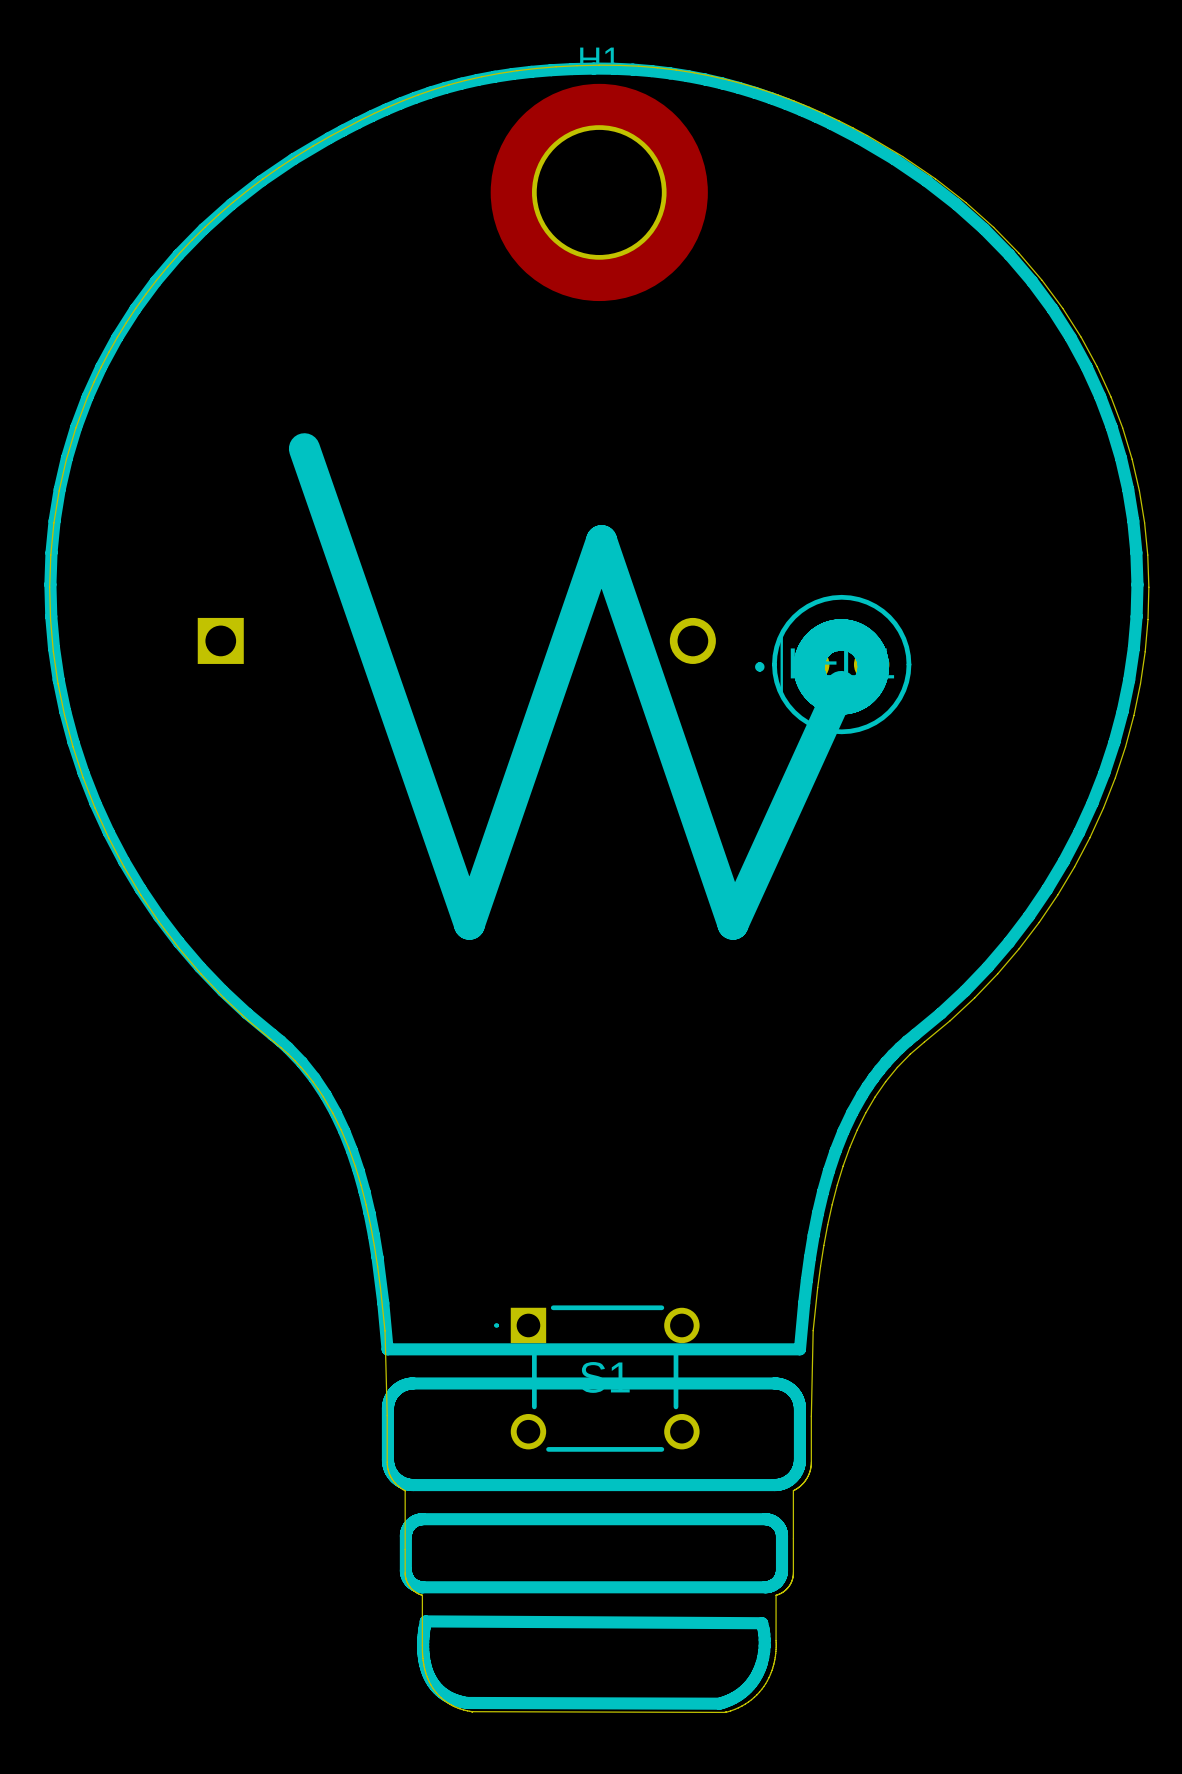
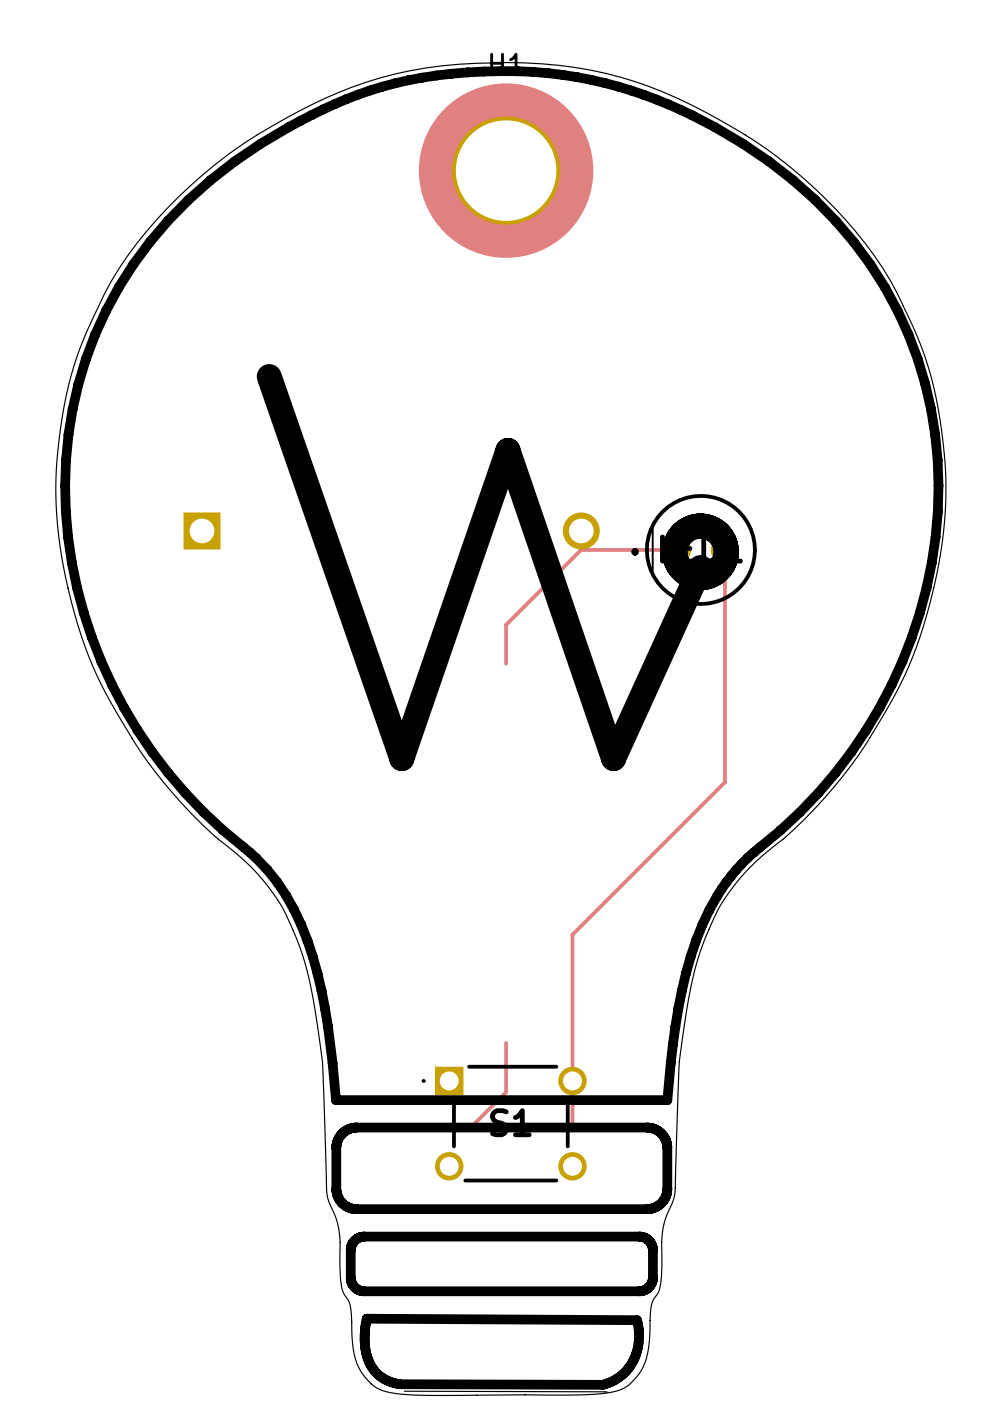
board edge: none -> (505, 62) (426, 67) (395, 73) (352, 87) (311, 104) (256, 135) (223, 158) (189, 186) (156, 219) (136, 243) (104, 293) (81, 343) (70, 376) (62, 417) (56, 463) (56, 512) (64, 571) (81, 637) (100, 683) (134, 743) (151, 766) (198, 820) (243, 860) (262, 879) (281, 906) (298, 942) (309, 982) (320, 1049) (326, 1192) (339, 1231) (340, 1281) (343, 1293) (350, 1305) (354, 1355) (361, 1371) (373, 1385) (386, 1391) (407, 1394) (600, 1393) (625, 1387) (640, 1371) (648, 1350) (651, 1304) (660, 1286) (663, 1226) (674, 1194) (679, 1061) (690, 990) (701, 948) (718, 909) (735, 883) (758, 859) (797, 826) (828, 792) (859, 753) (888, 706) (908, 666) (923, 626) (937, 570) (944, 520) (945, 479) (941, 429) (933, 385) (922, 350) (897, 293) (882, 267) (864, 243) (834, 207) (801, 176) (766, 149) (717, 118) (677, 98) (635, 81) (591, 70) (541, 63) (505, 62)
track: none -> (676, 549) (581, 549) (506, 624) (506, 663)
track: none -> (724, 549) (724, 782) (572, 934) (572, 1128)
track: none -> (506, 1043) (506, 1092) (469, 1128) (449, 1128)
board edge: (471, 1711) (454, 1706) (441, 1698) (430, 1684) (424, 1666) (422, 1595) (411, 1588) (405, 1575) (405, 1490) (393, 1481) (387, 1466) (385, 1330) (377, 1266) (366, 1204) (348, 1147) (332, 1113) (312, 1081) (288, 1054) (223, 997) (179, 948) (140, 895) (108, 837) (83, 777) (73, 746) (58, 683) (50, 619) (50, 555) (59, 490) (66, 459) (87, 397) (101, 366) (126, 322) (156, 280) (191, 240) (218, 214) (263, 178) (295, 156) (360, 120) (403, 100) (448, 84) (499, 73) (556, 66) (599, 65) (657, 67) (711, 76) (762, 89) (809, 107) (853, 128) (902, 156) (935, 178) (993, 227) (1042, 280) (1062, 308) (1097, 366) (1111, 397) (1132, 459) (1139, 490) (1147, 555) (1148, 619) (1140, 683) (1125, 746) (1115, 777) (1089, 837) (1057, 895) (1019, 948) (974, 997) (897, 1067) (875, 1096) (849, 1147) (832, 1204) (817, 1287) (813, 1330) (811, 1464) (805, 1480) (793, 1490) (792, 1577) (787, 1588) (776, 1595) (775, 1651) (769, 1677) (761, 1689) (751, 1699) (726, 1712) -> none

